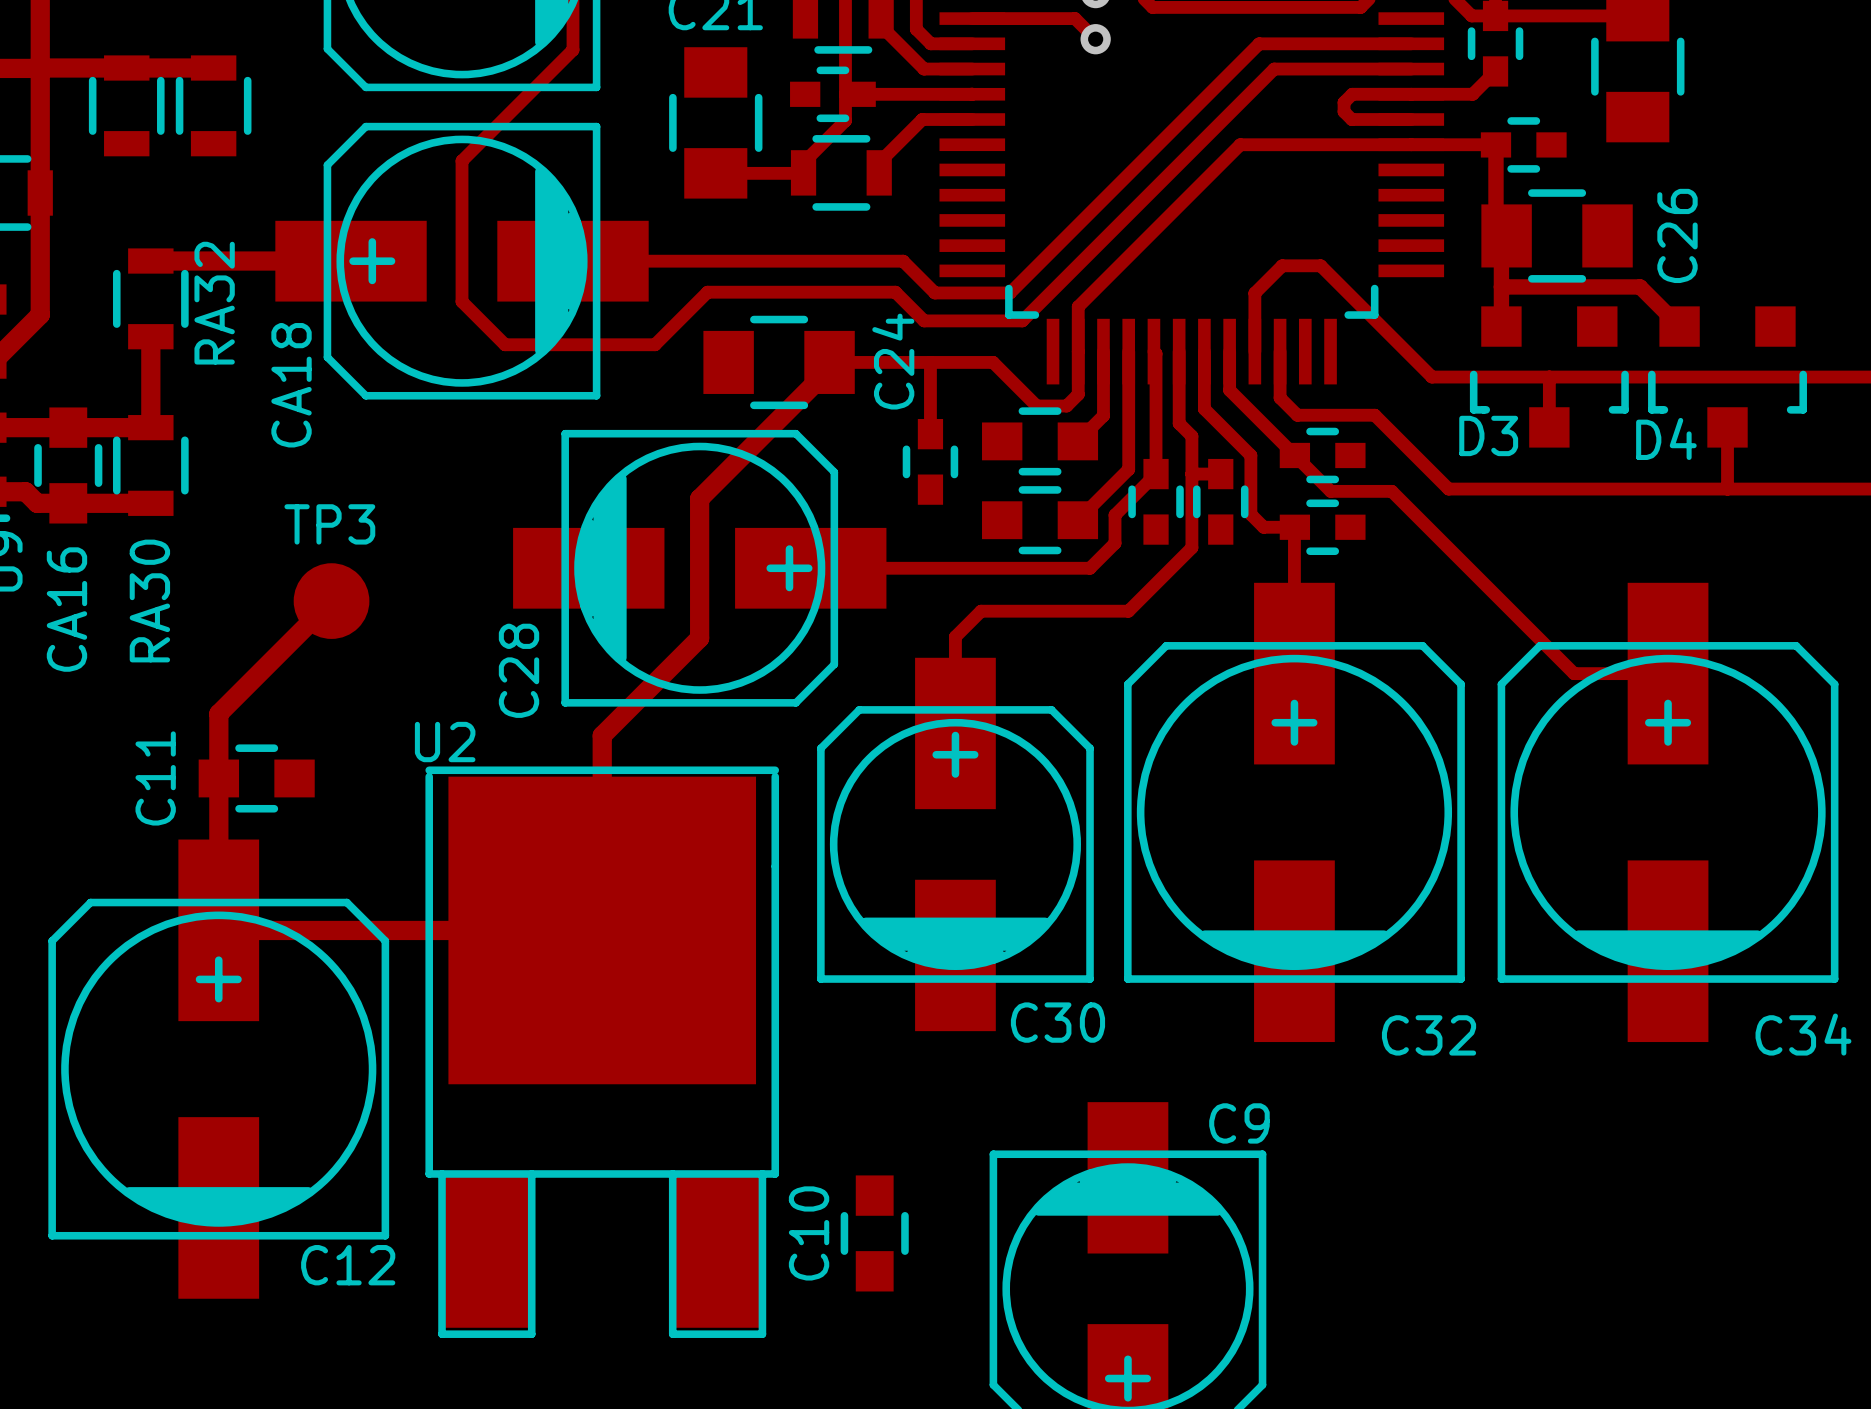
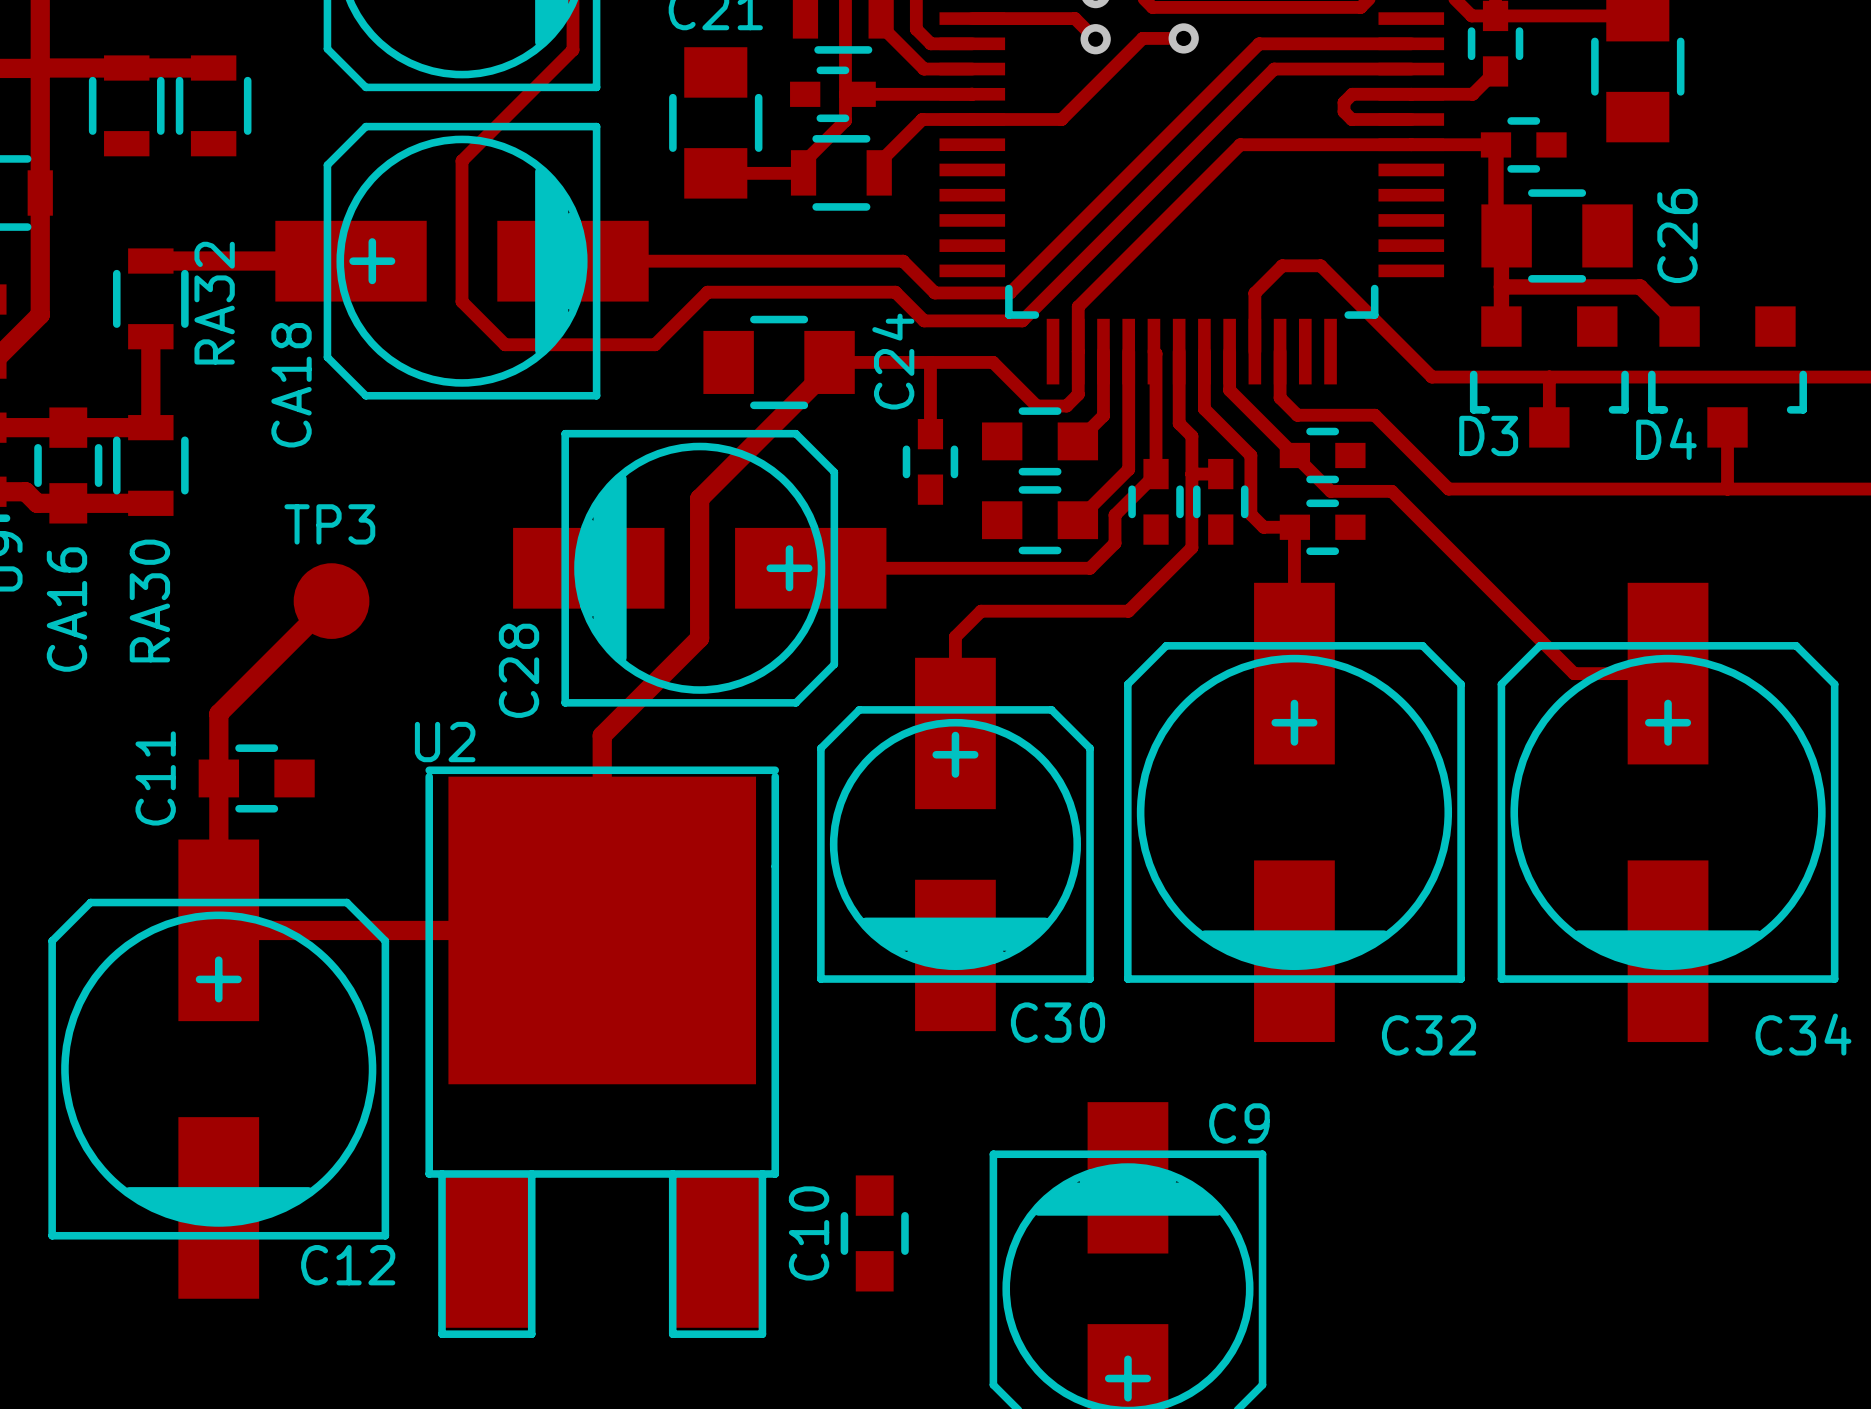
track: none -> (1183, 38) (1142, 38) (1061, 119) (972, 119)
via: none -> (1183, 38)

